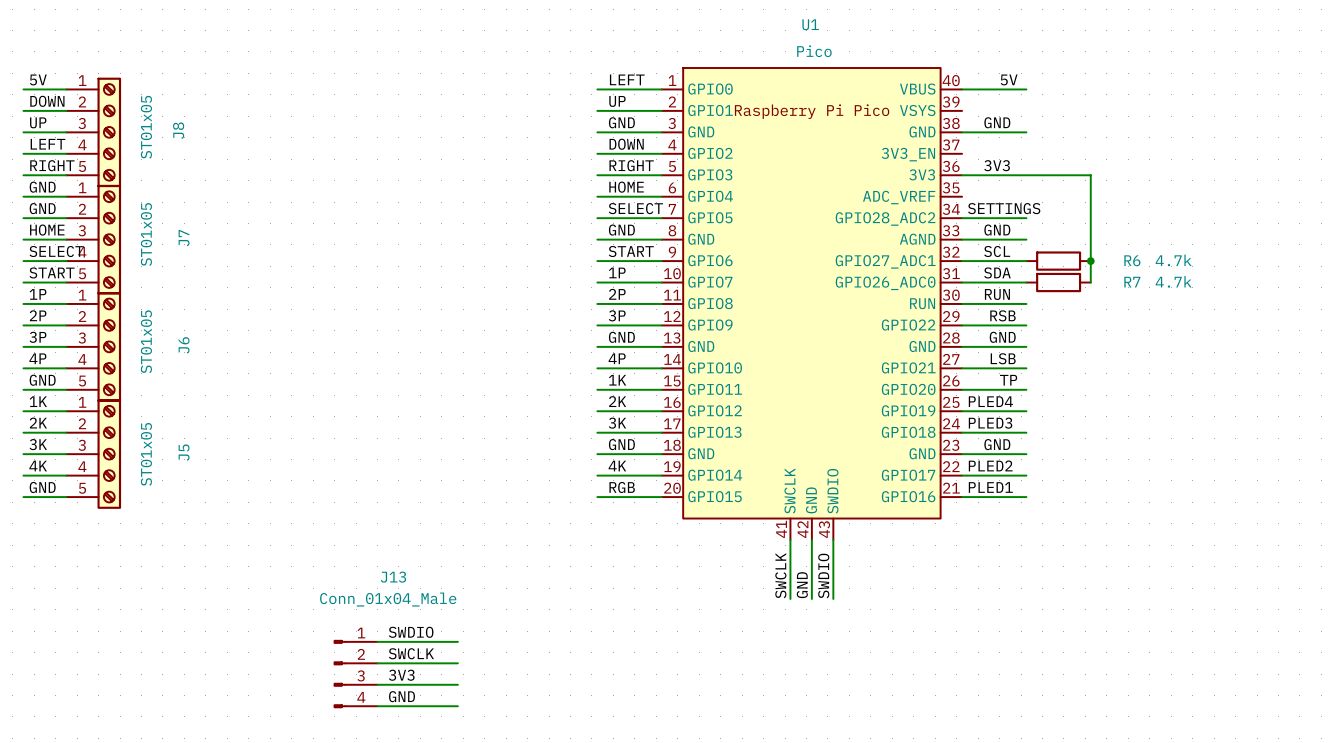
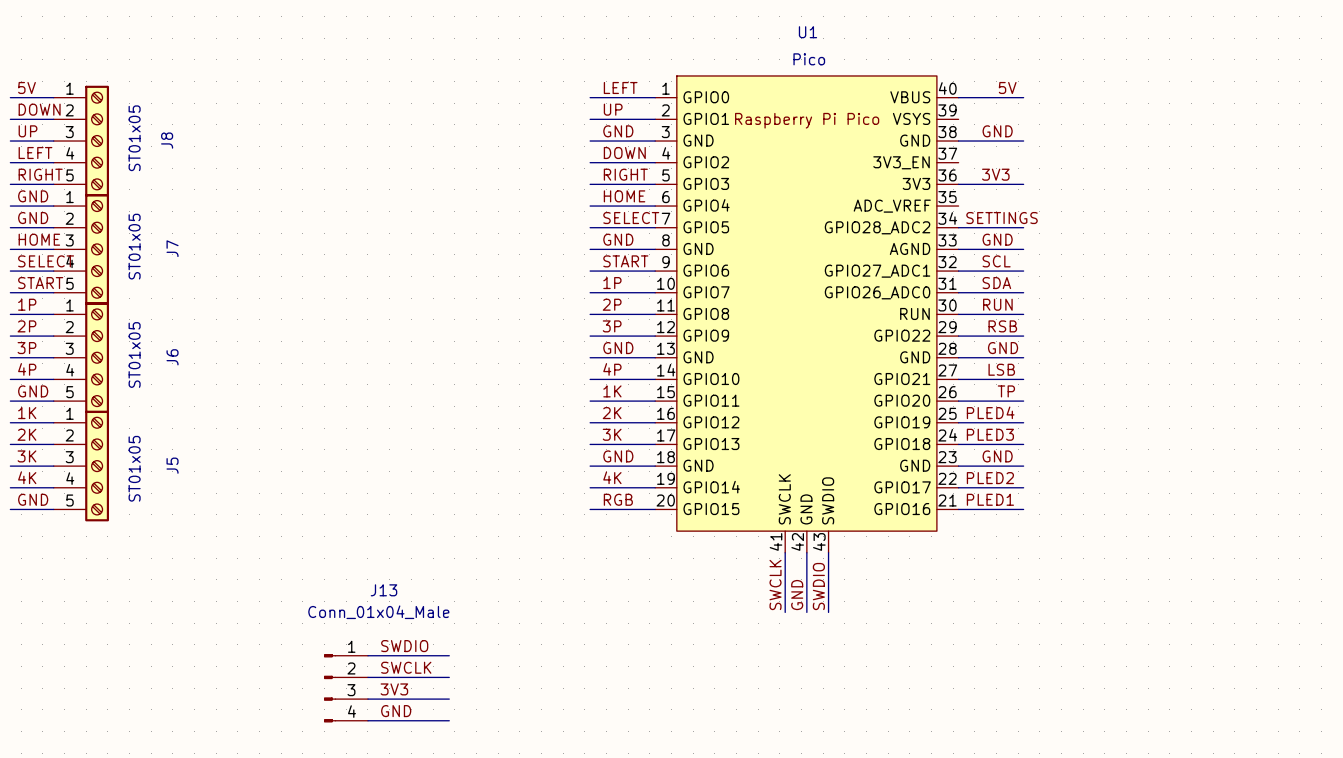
wire: (1026, 175) (1090, 175) (1090, 282) -> none
R6: 4.7k (1058, 261) -> none
junction: (1090, 261) -> none
R7: 4.7k (1058, 282) -> none

